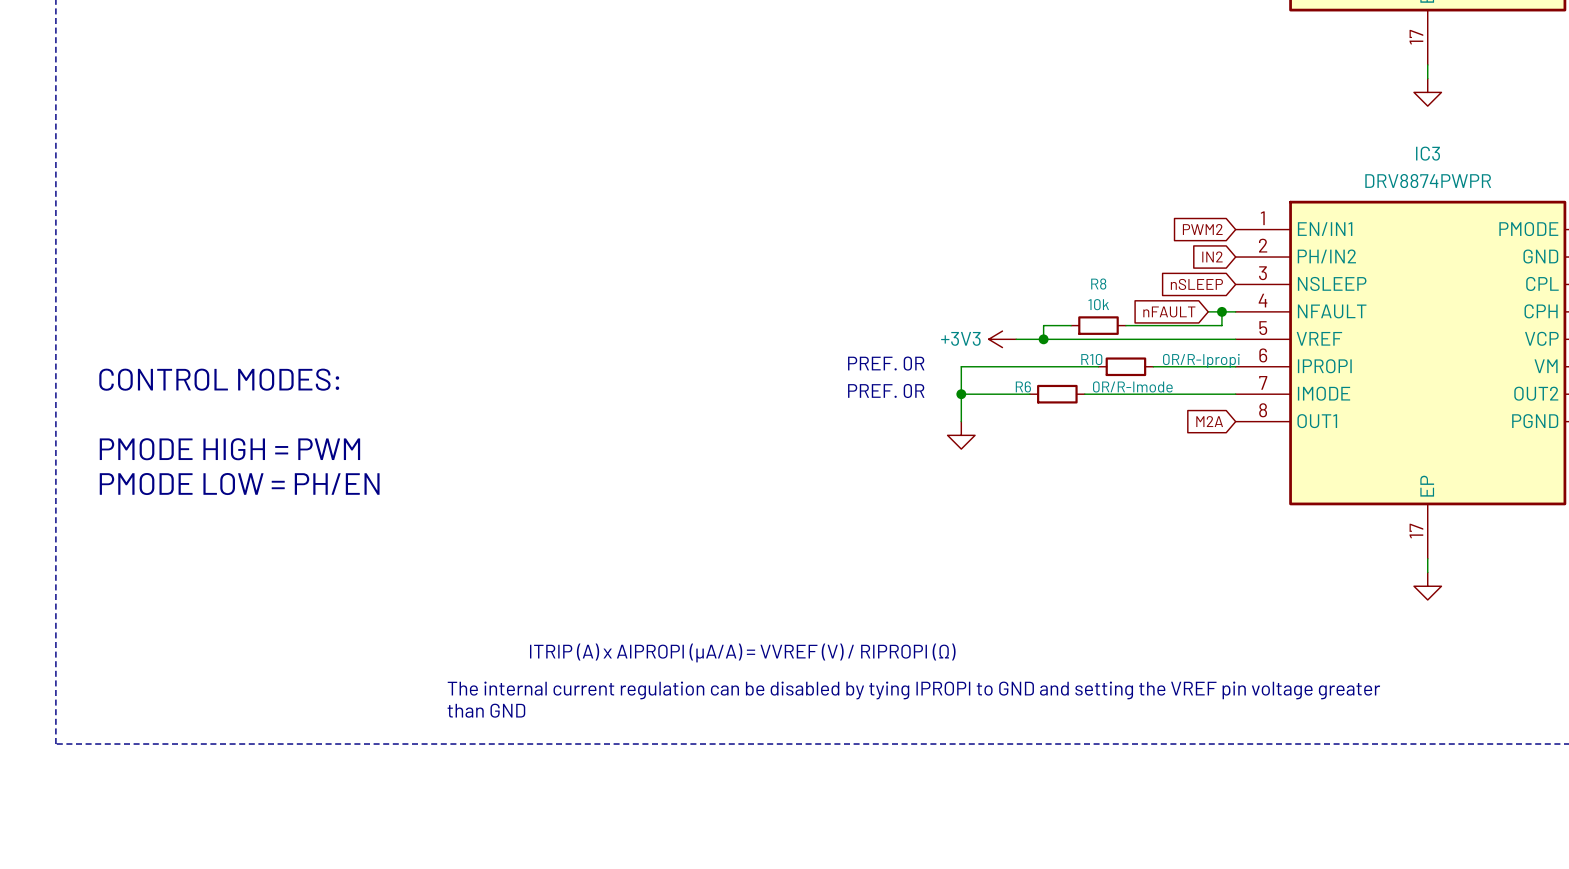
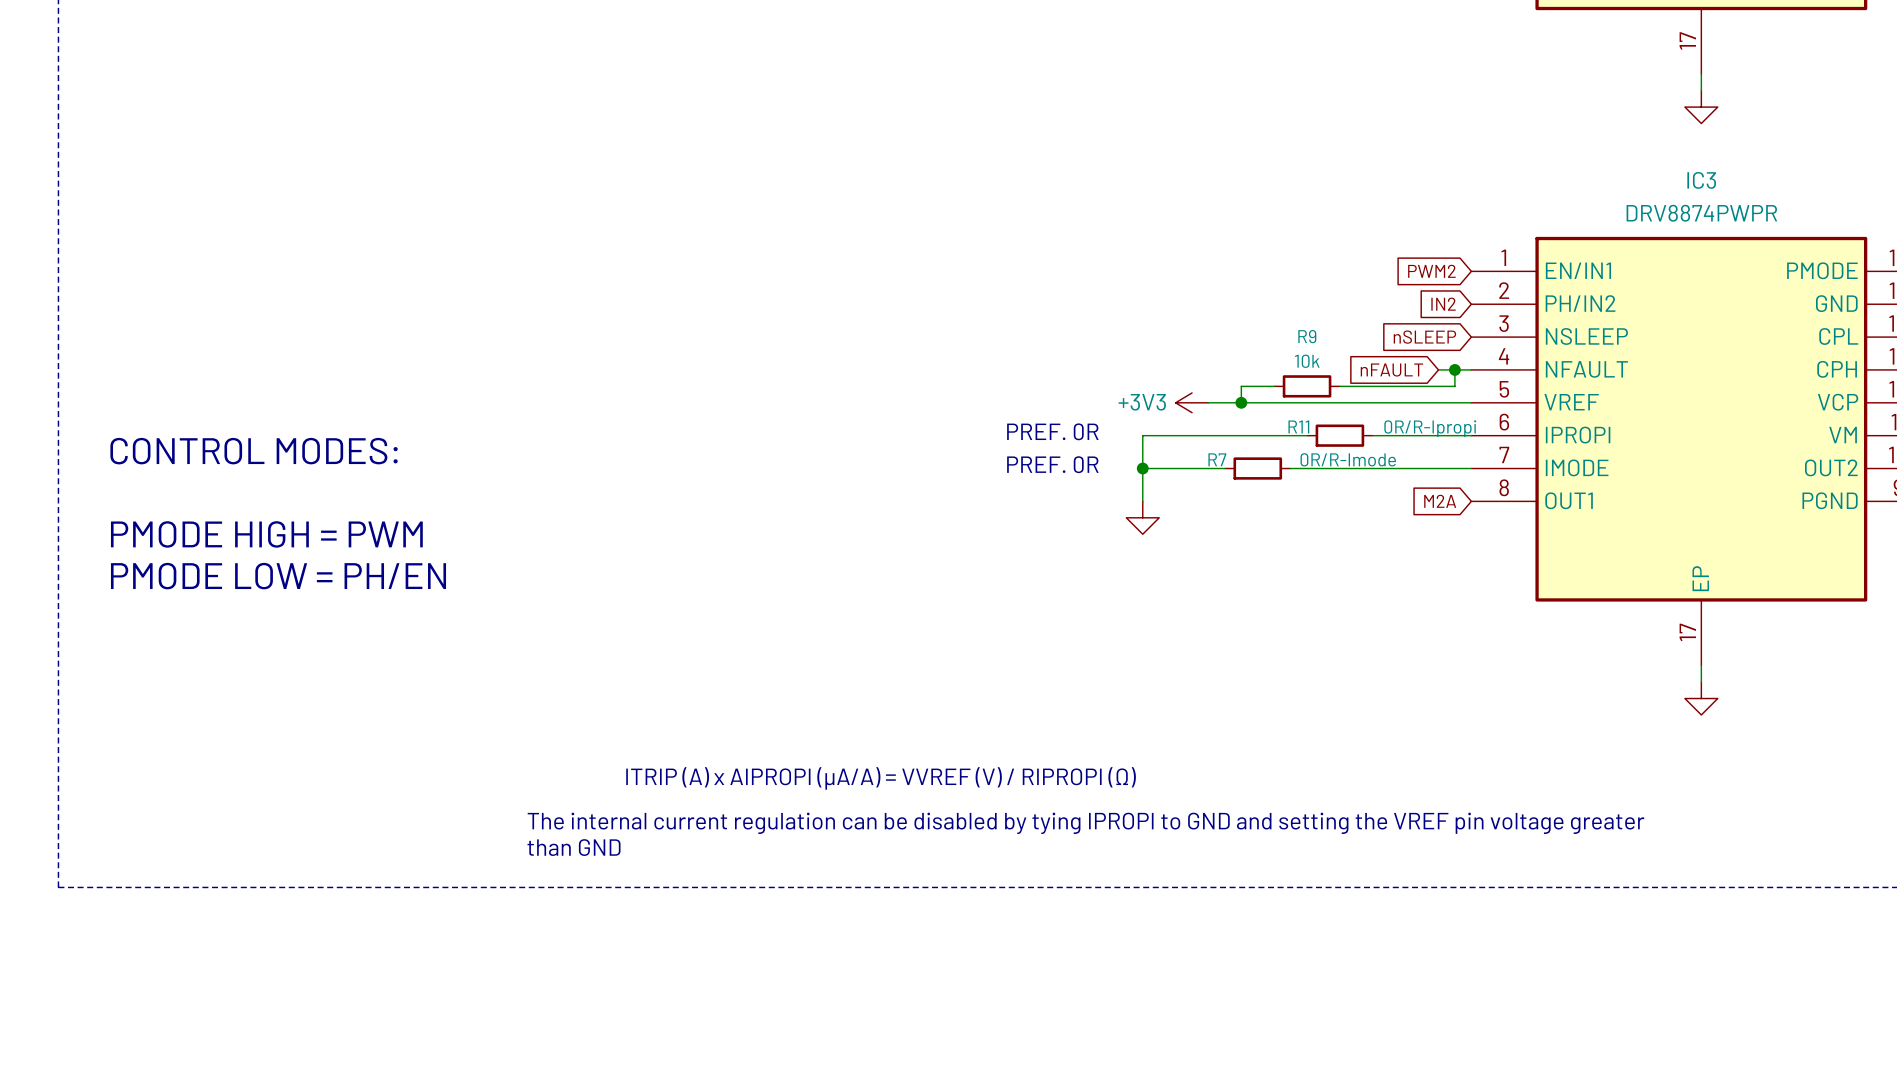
R8 name: R8 (1098, 284) -> R9 (1307, 336)
R10 name: R10 (1091, 359) -> R11 (1298, 426)
R6 name: R6 (1023, 386) -> R7 (1217, 459)

